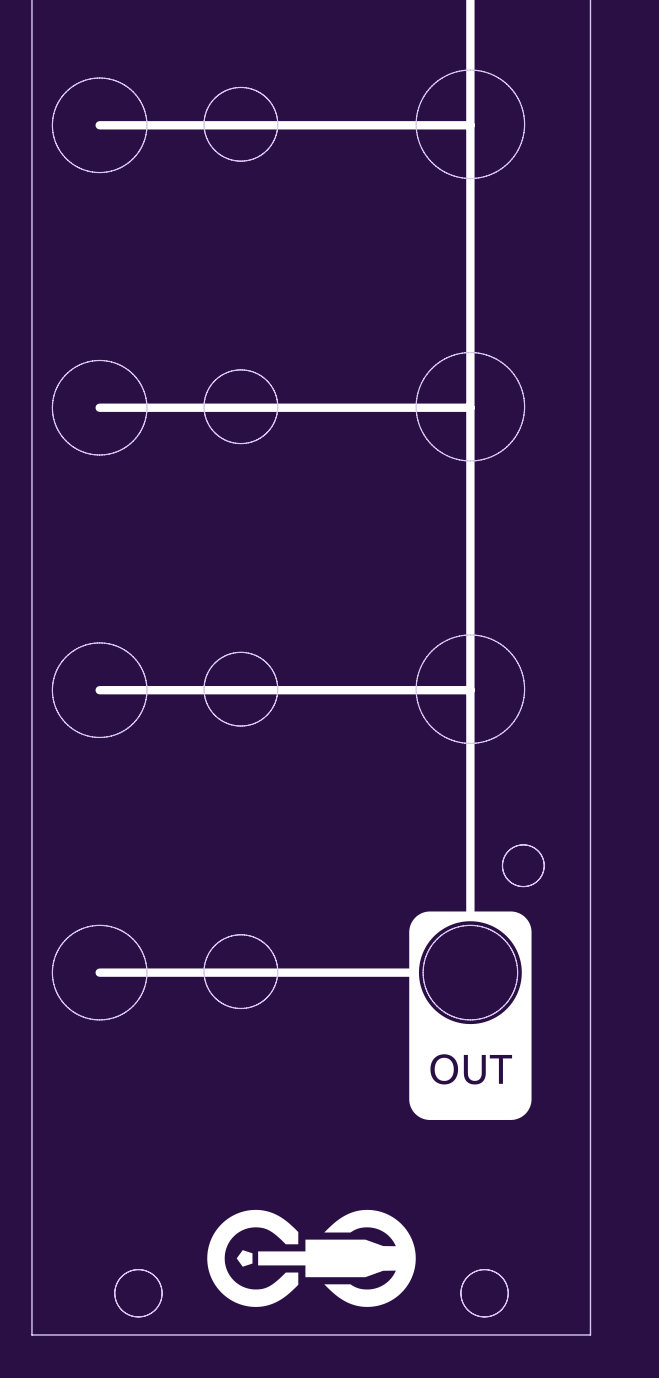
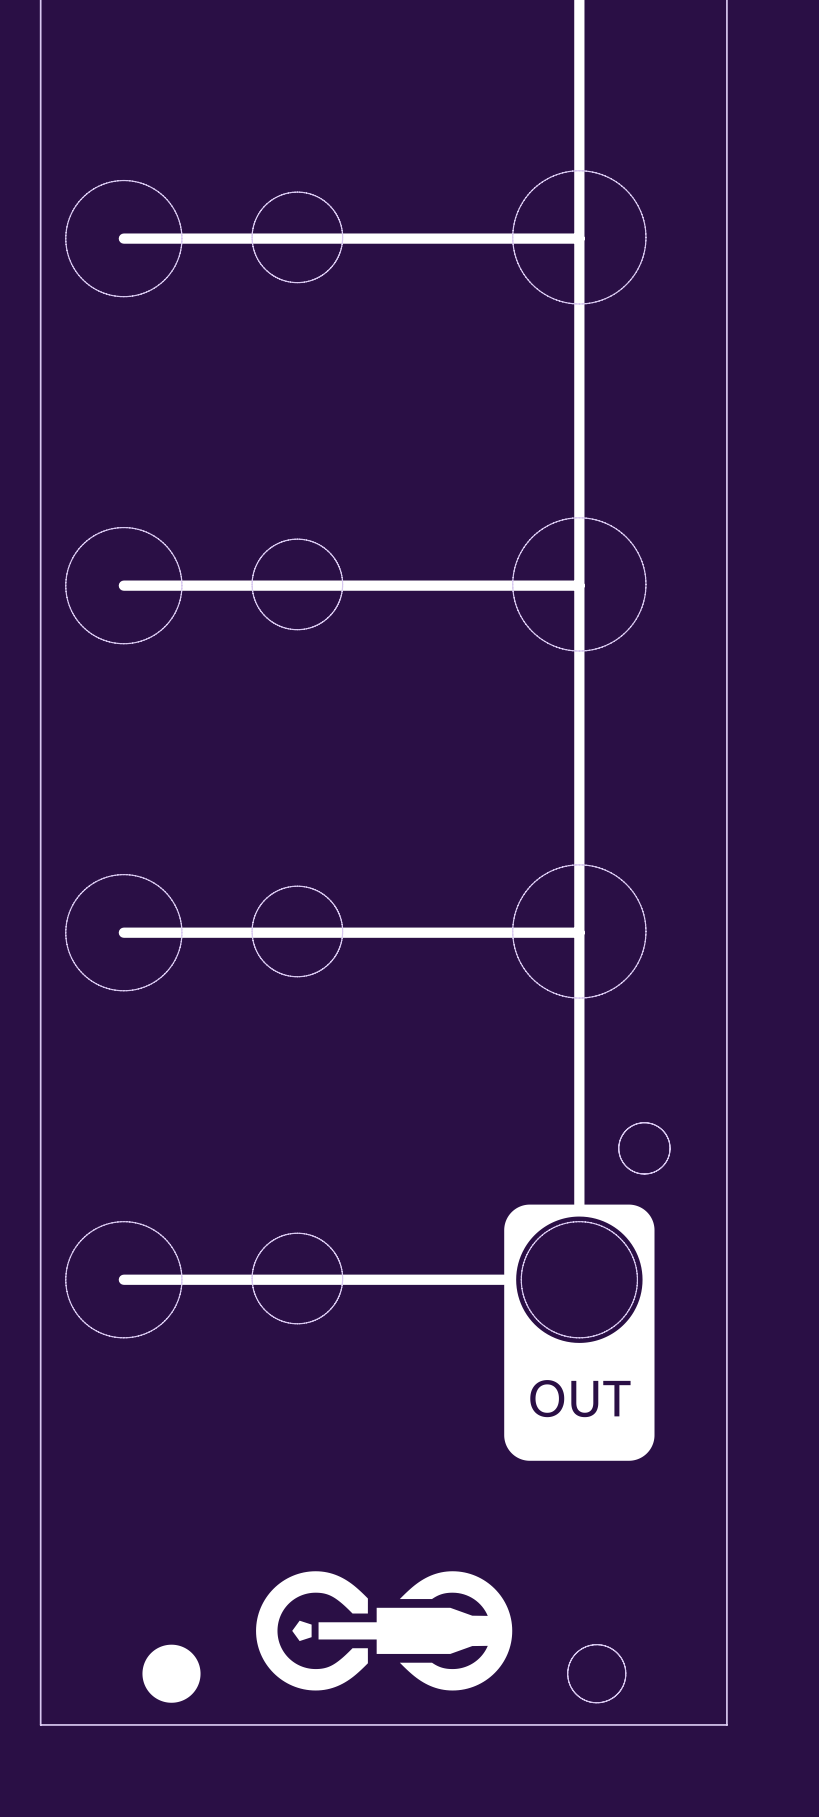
drawing: none -> [142, 1644, 201, 1703]
board edge: (137, 1269) (128, 1271) (120, 1277) (116, 1285) (114, 1294) (117, 1303) (122, 1310) (130, 1315) (139, 1316) (148, 1314) (155, 1309) (160, 1301) (162, 1292) (159, 1283) (154, 1275) (146, 1271) (137, 1269) -> none

